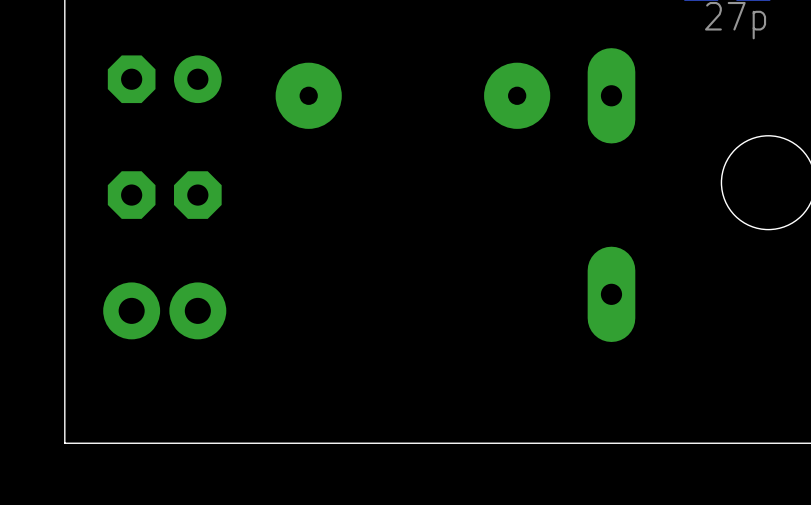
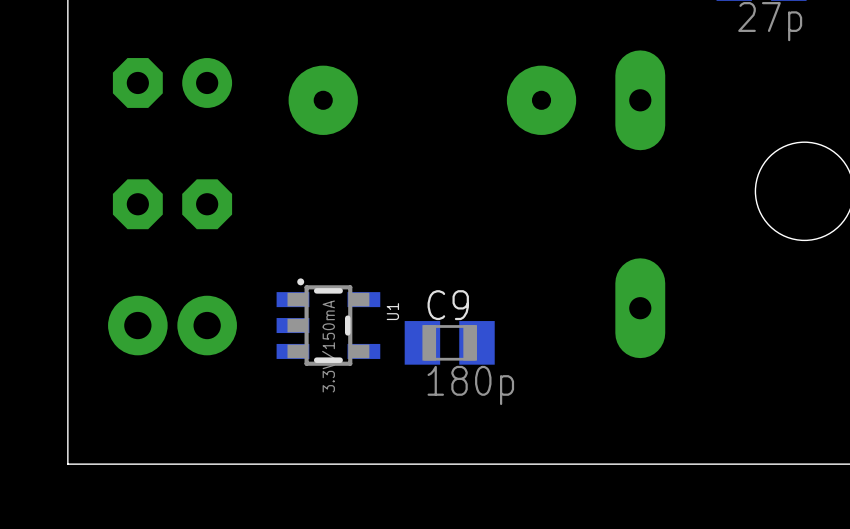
U1: none -> 3.3V/150mA (328, 322)
C9: none -> 180p (449, 342)

